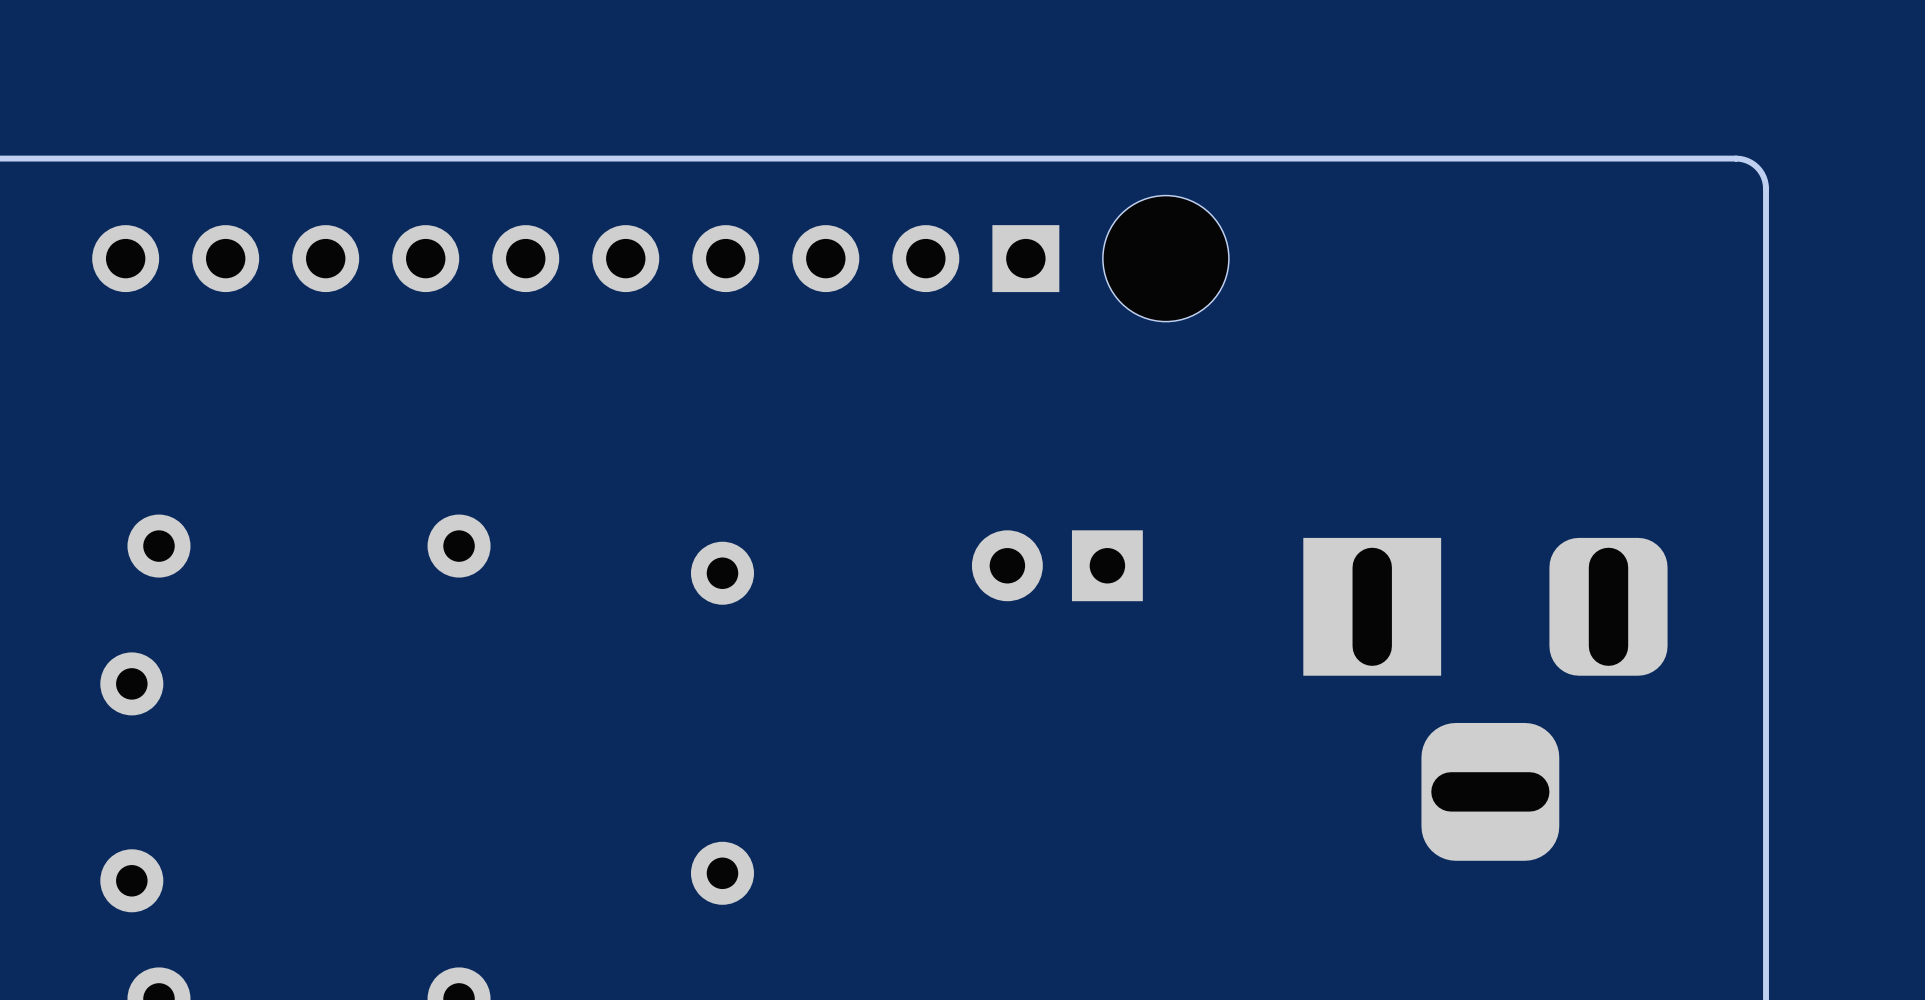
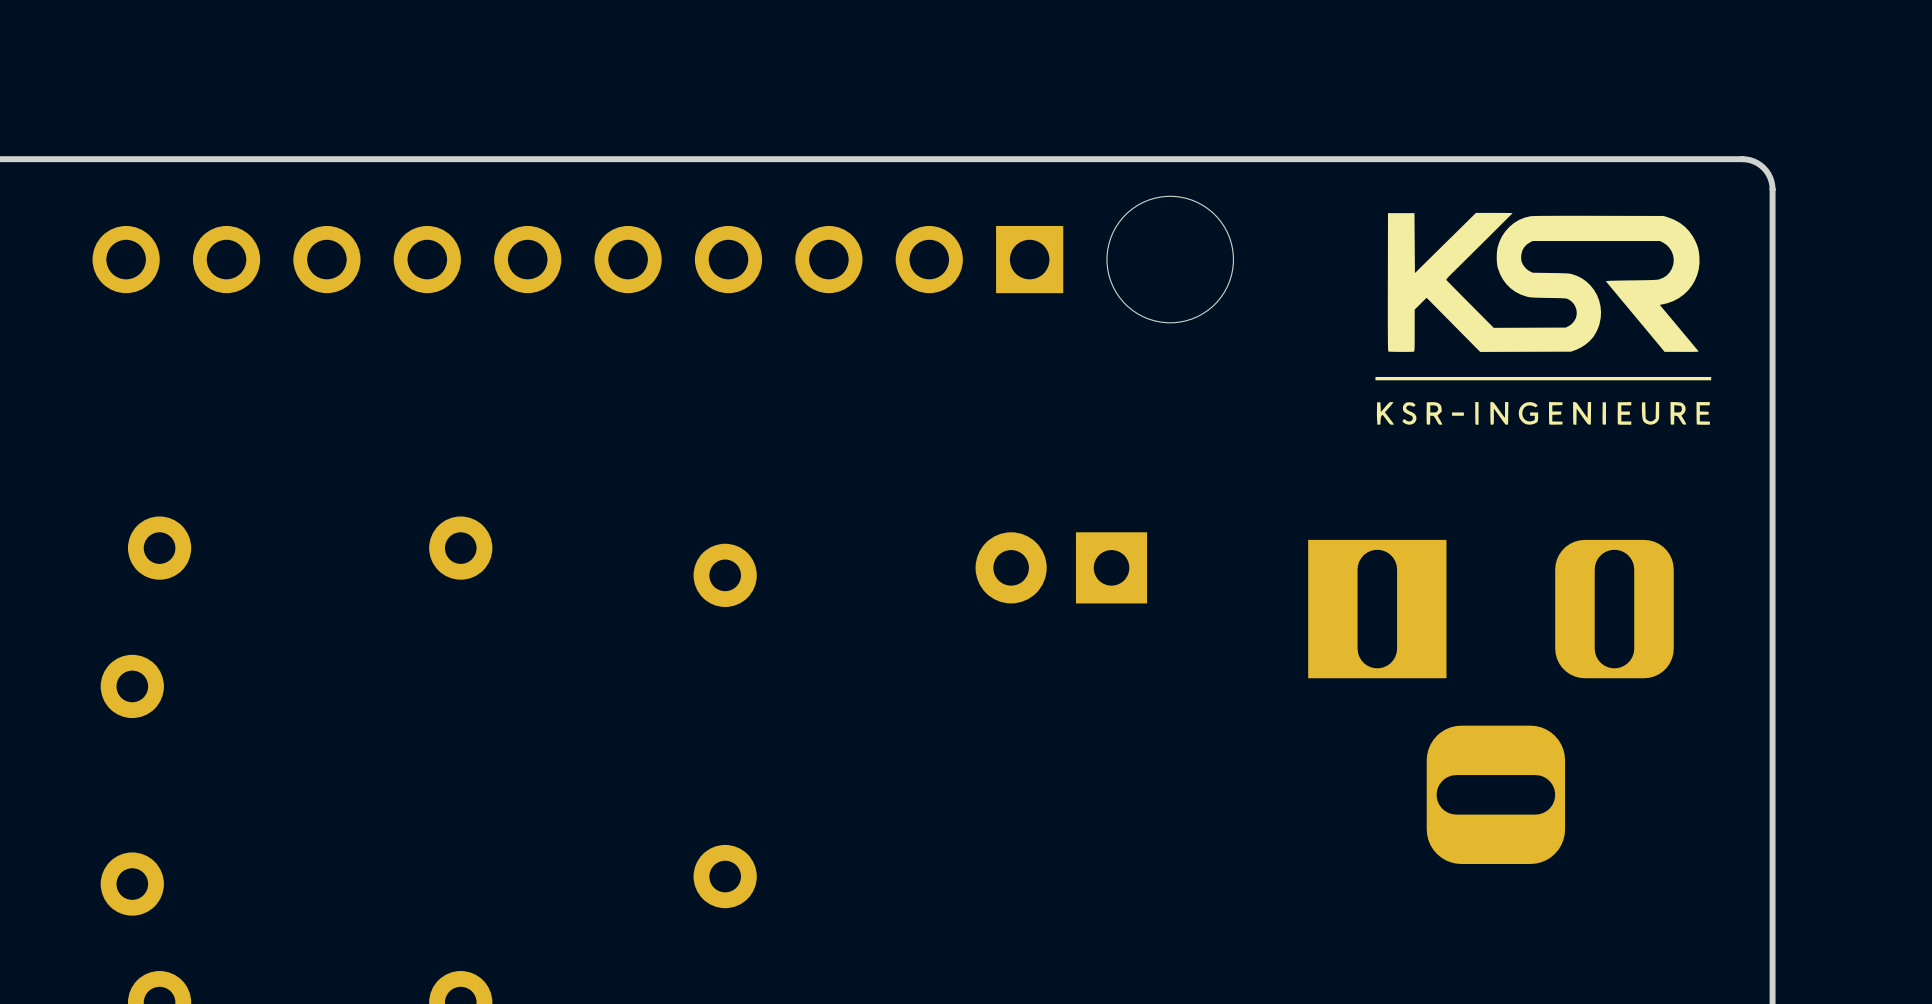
drawing: none -> [1375, 212, 1712, 425]

